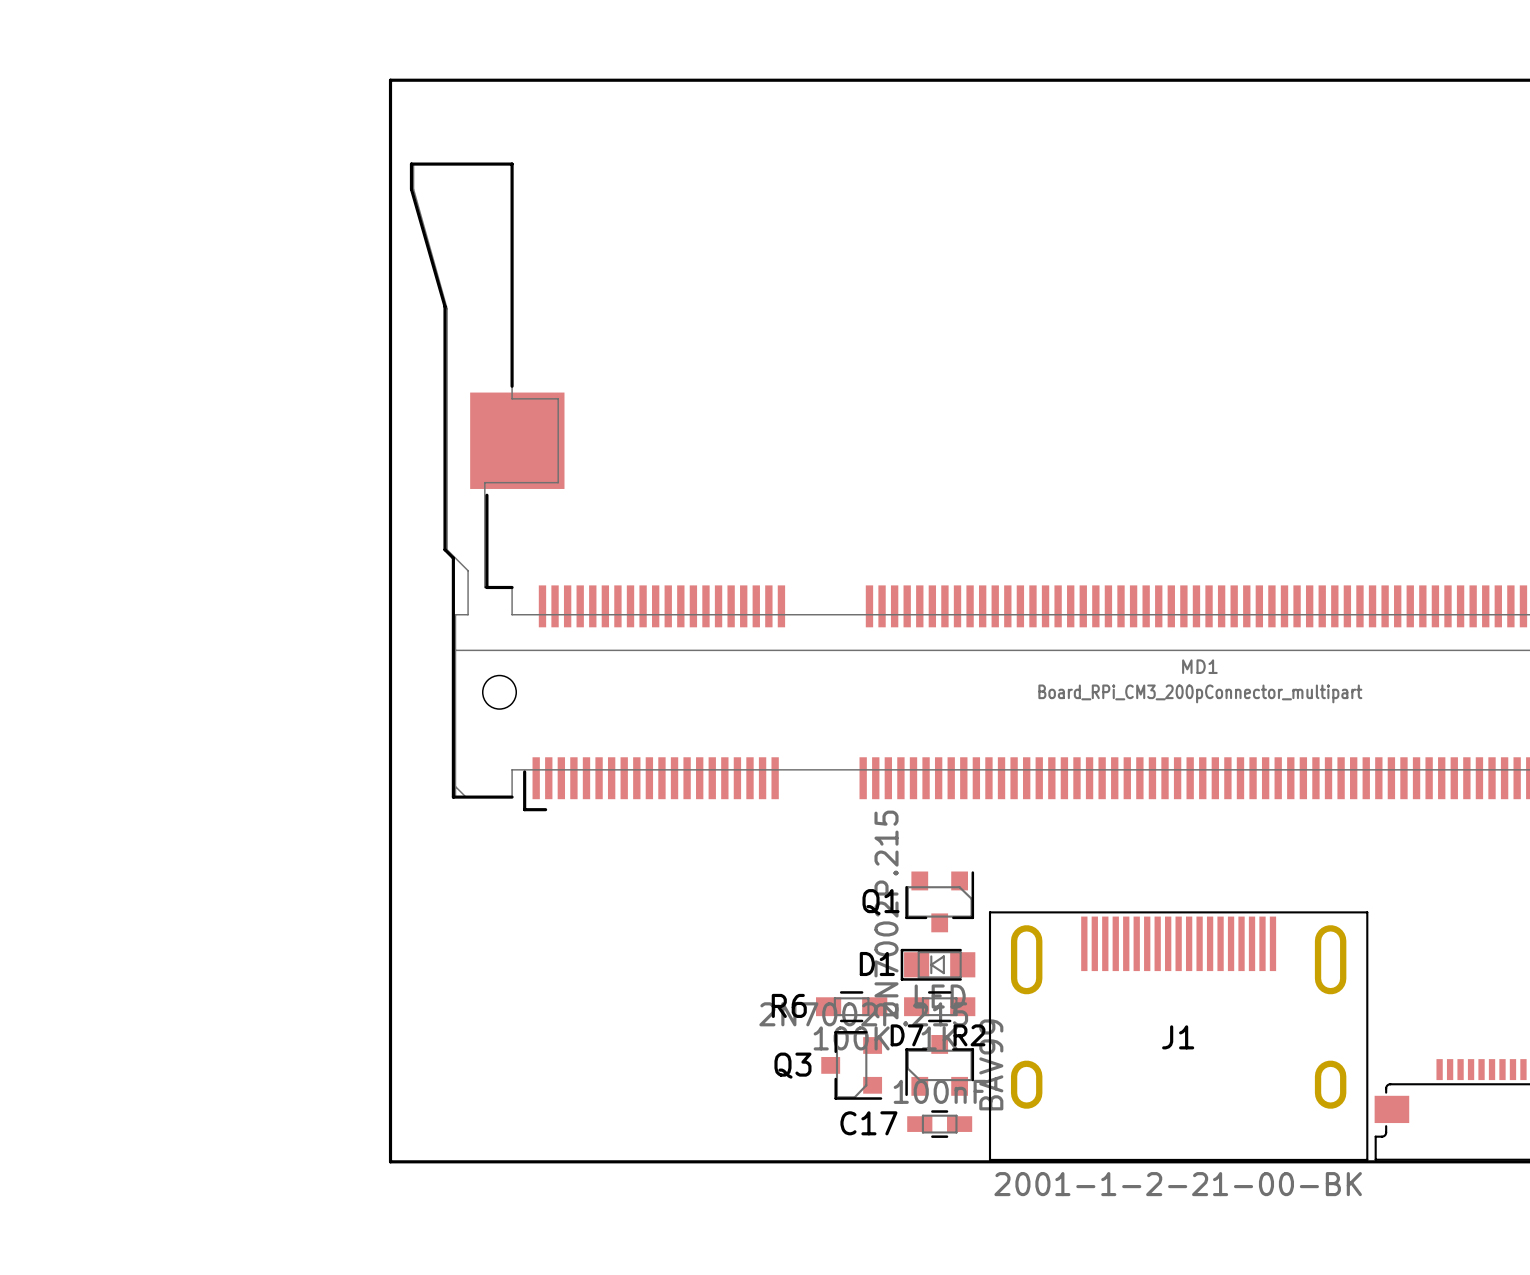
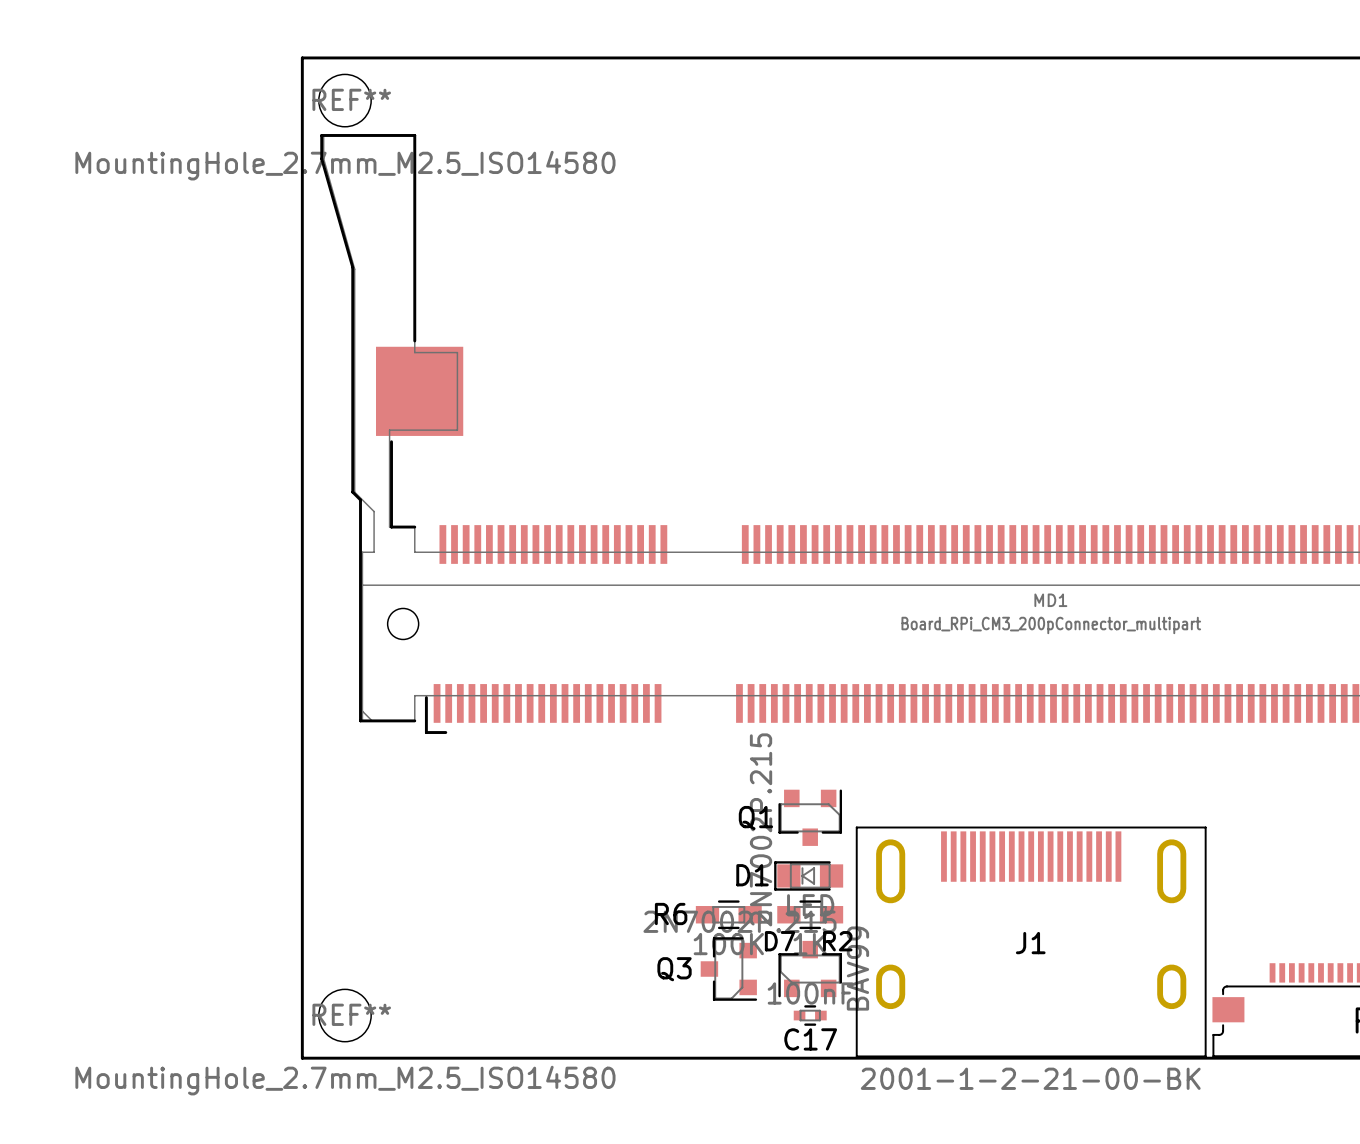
REF**: none -> MountingHole_2.7mm_M2.5_ISO14580 (344, 100)
C17 footprint: [907, 1110, 973, 1138] -> [793, 1005, 827, 1026]
REF**: none -> MountingHole_2.7mm_M2.5_ISO14580 (344, 1015)
C17 name position: C17 (868, 1123) -> C17 (810, 1039)

